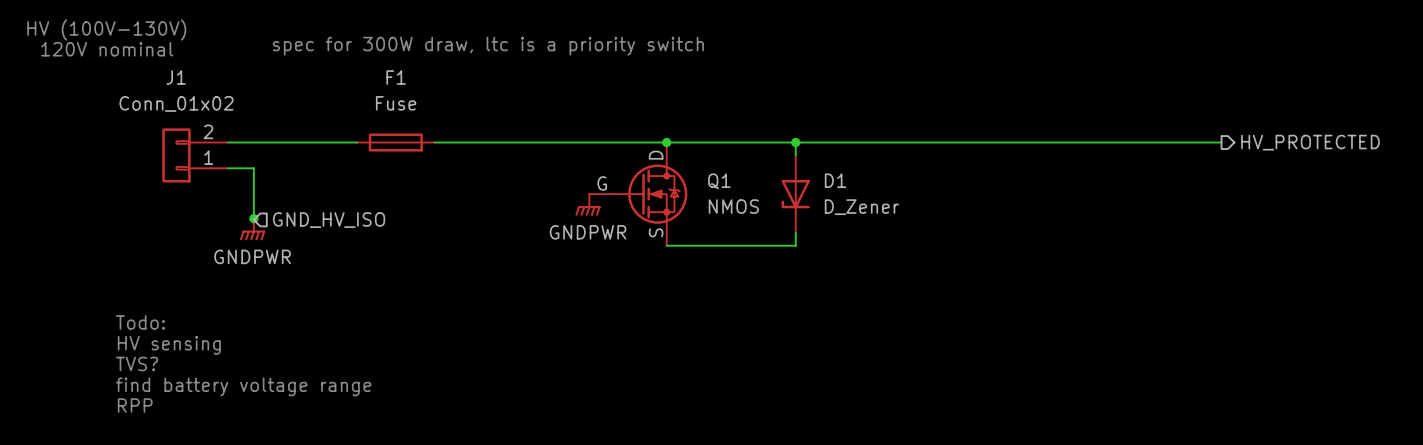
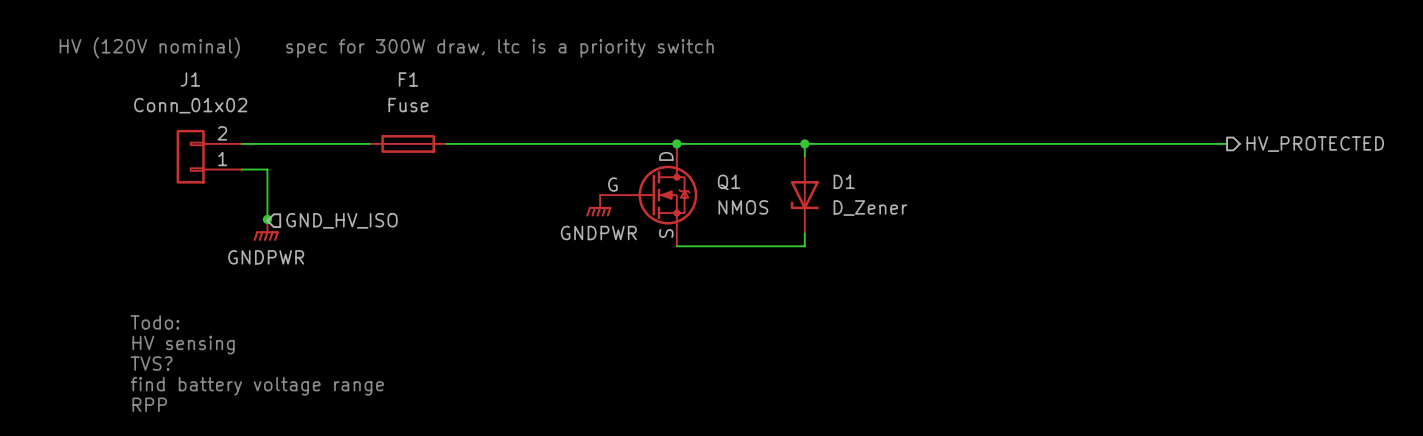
text: HV (100V-130V) (106, 30) -> none
text: 120V nominal (107, 49) -> HV (120V nominal) (149, 47)

